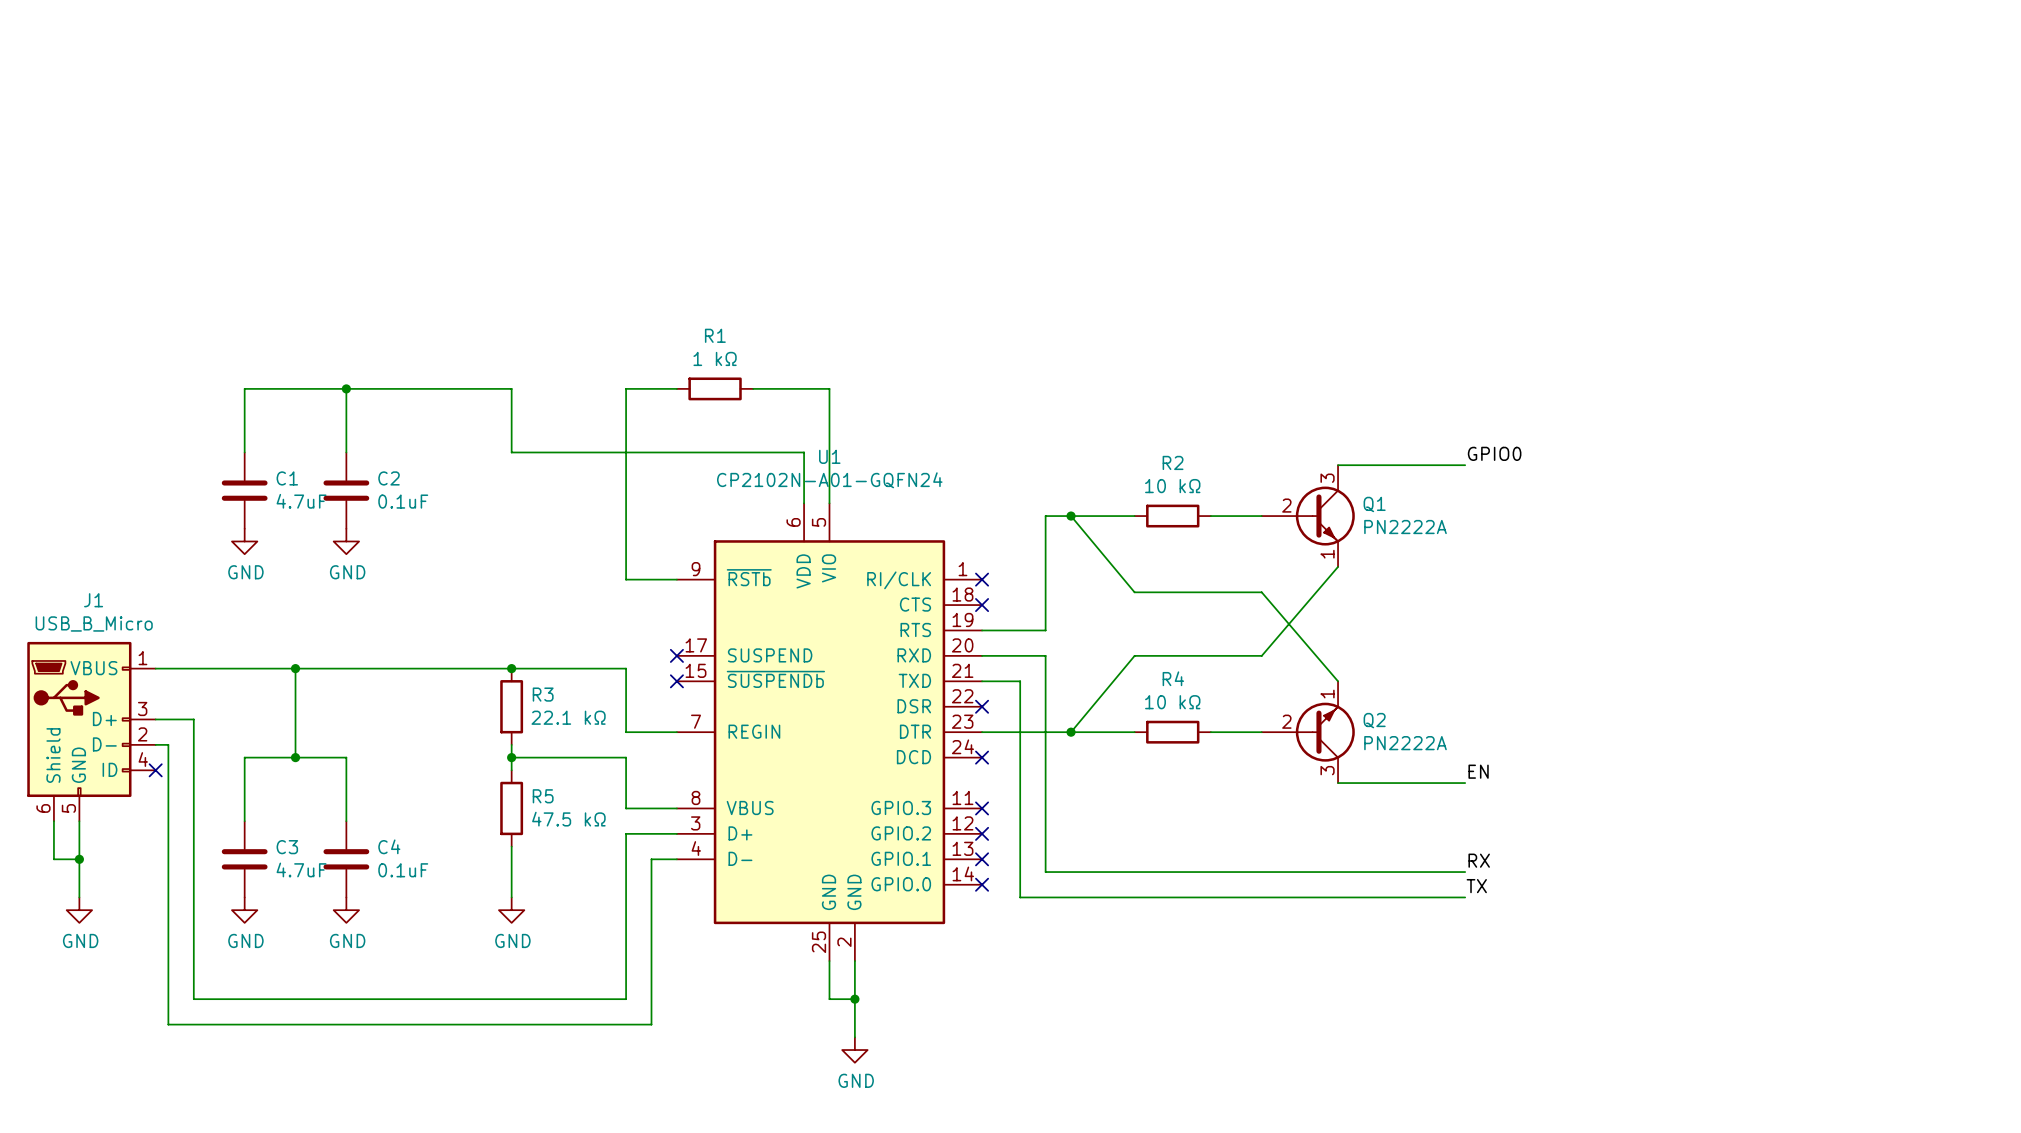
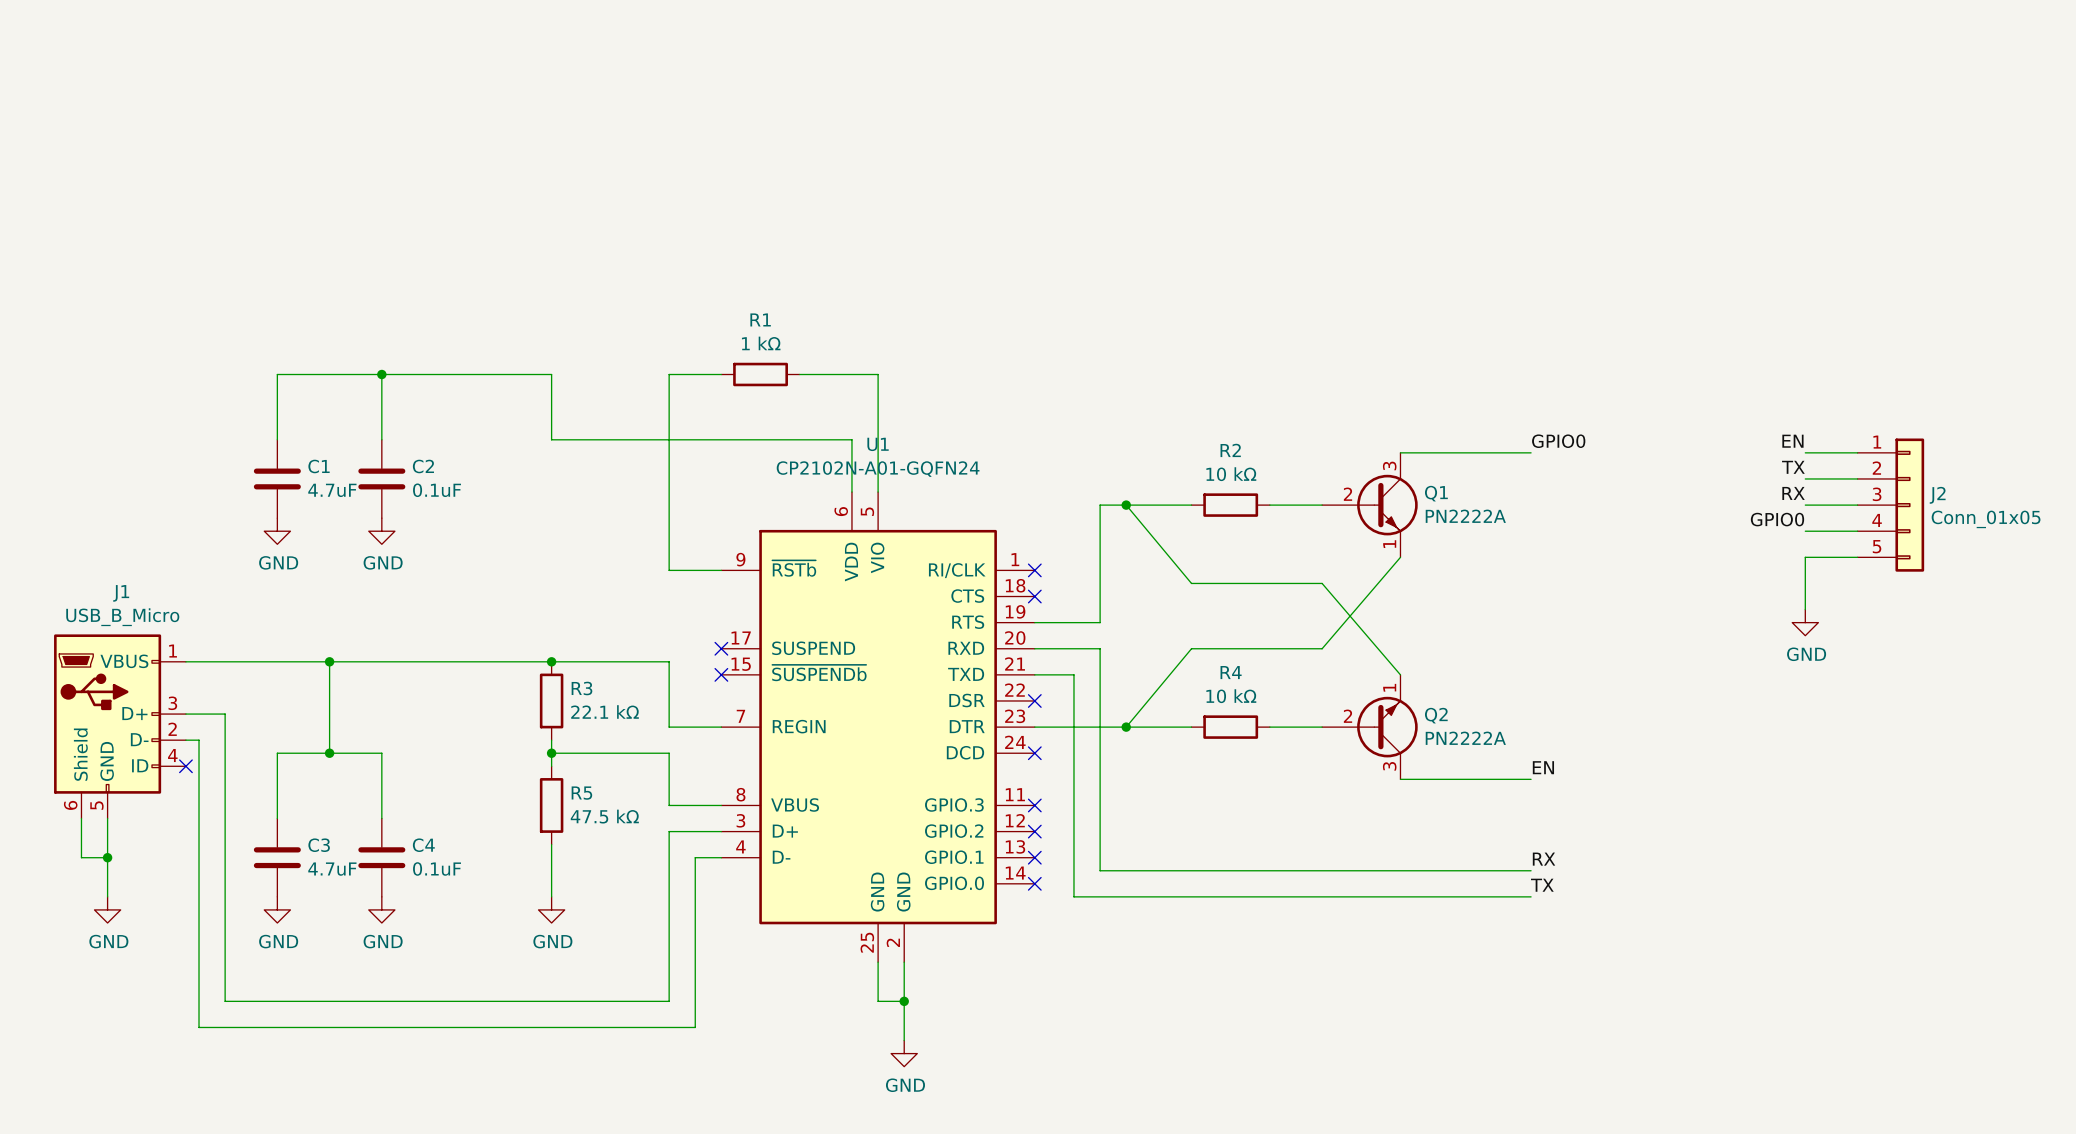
label: none -> EN (1792, 441)
wire: none -> (1805, 452) (1857, 452)
label: none -> TX (1793, 467)
wire: none -> (1805, 478) (1857, 478)
label: none -> RX (1793, 493)
wire: none -> (1805, 505) (1857, 505)
J2: none -> Conn_01x05 (1890, 505)
label: none -> GPIO0 (1777, 519)
wire: none -> (1805, 531) (1857, 531)
wire: none -> (1857, 557) (1805, 557) (1805, 609)
power symbol: none -> GND (1805, 622)

